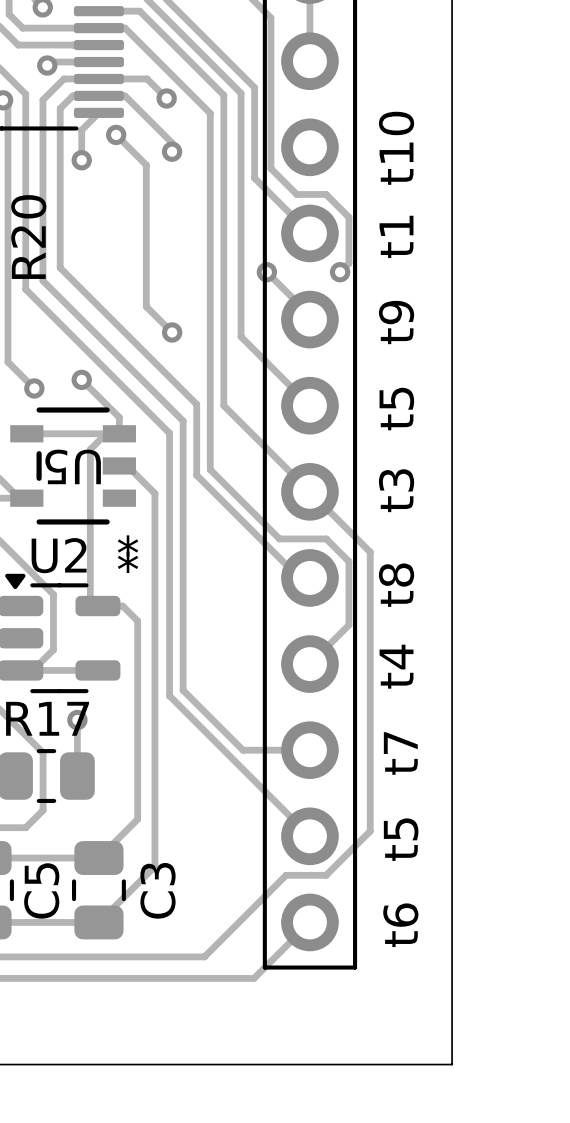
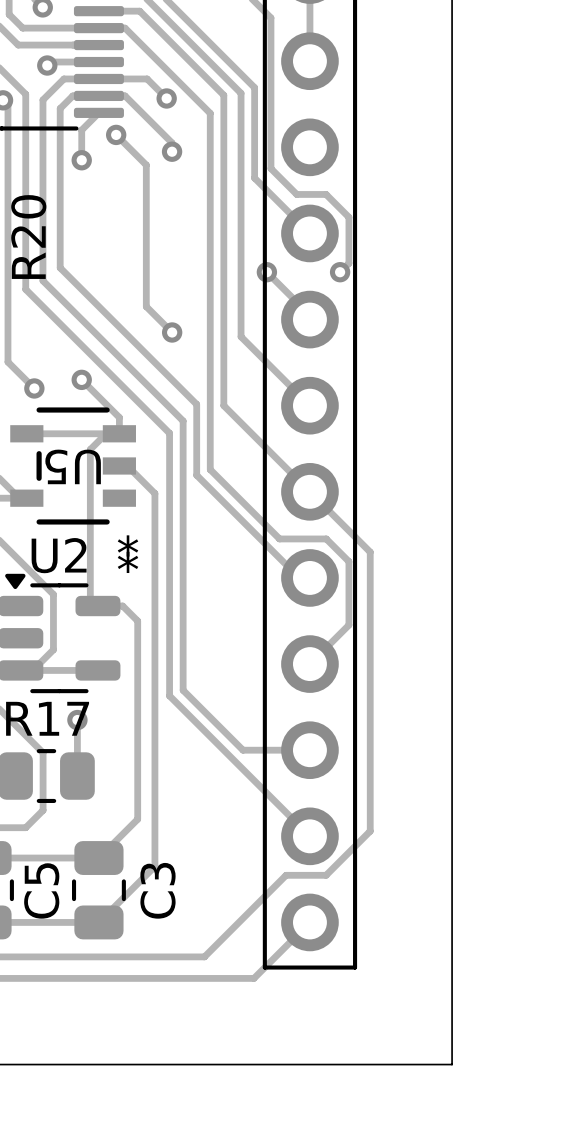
text: t10 (396, 148) -> none
text: t1 (396, 236) -> none
text: t9 (396, 322) -> none
text: t5 (396, 409) -> none
text: t3 (396, 490) -> none
text: t8 (396, 585) -> none
text: t4 (396, 666) -> none
text: t7 (400, 753) -> none
text: t5 (401, 839) -> none
text: t6 (400, 925) -> none

